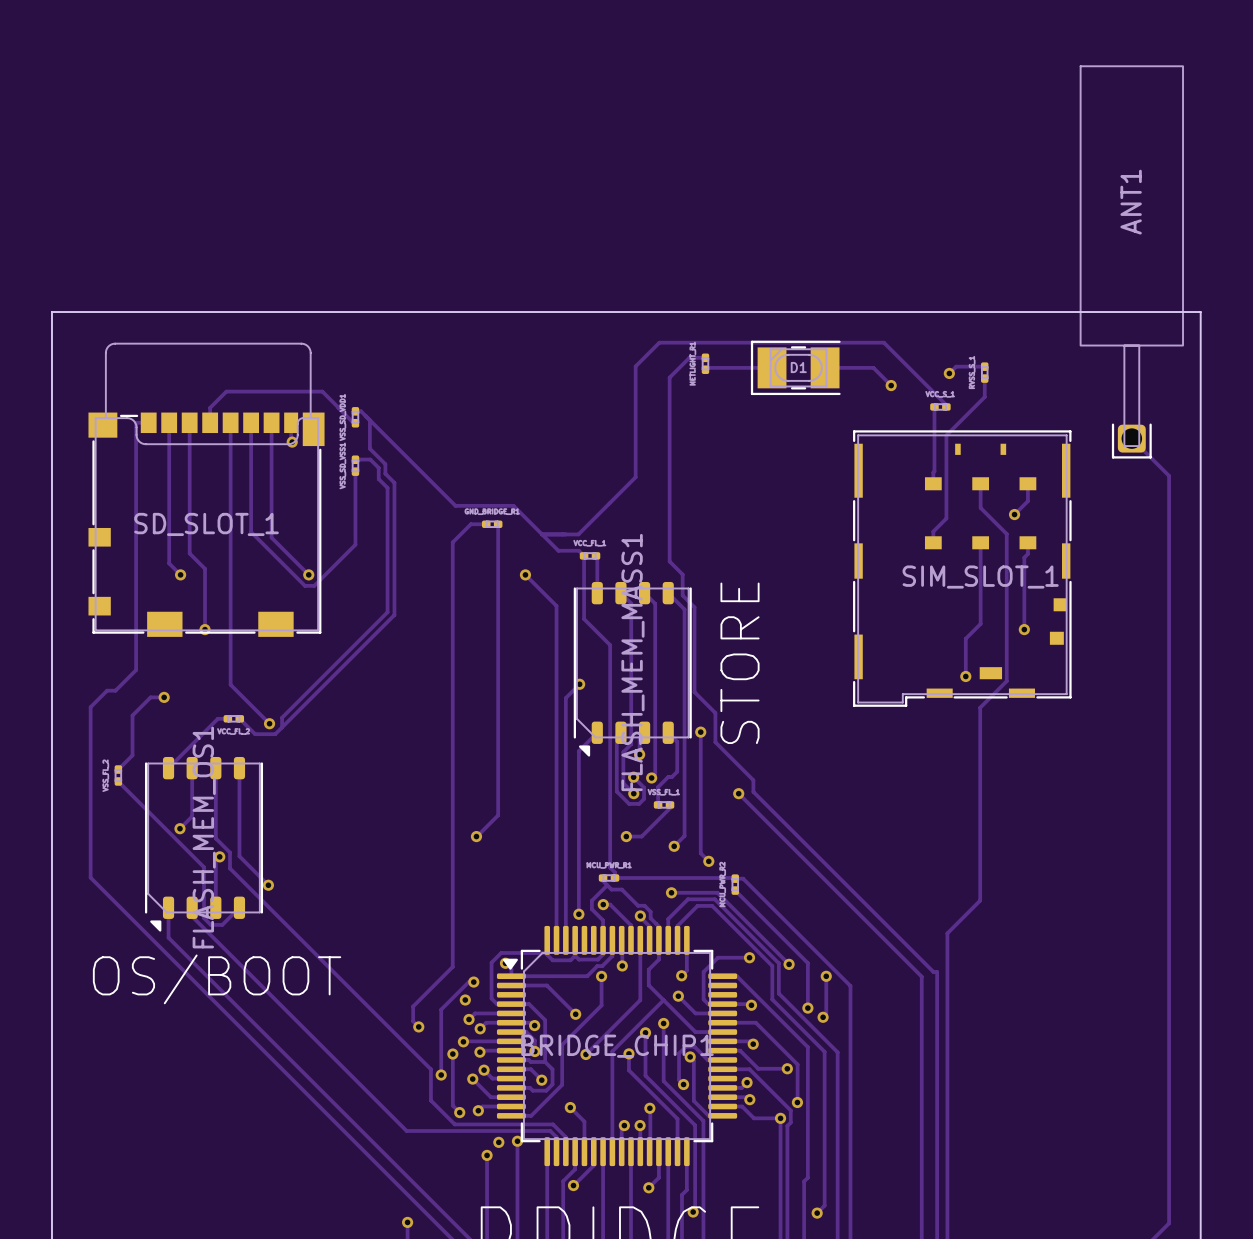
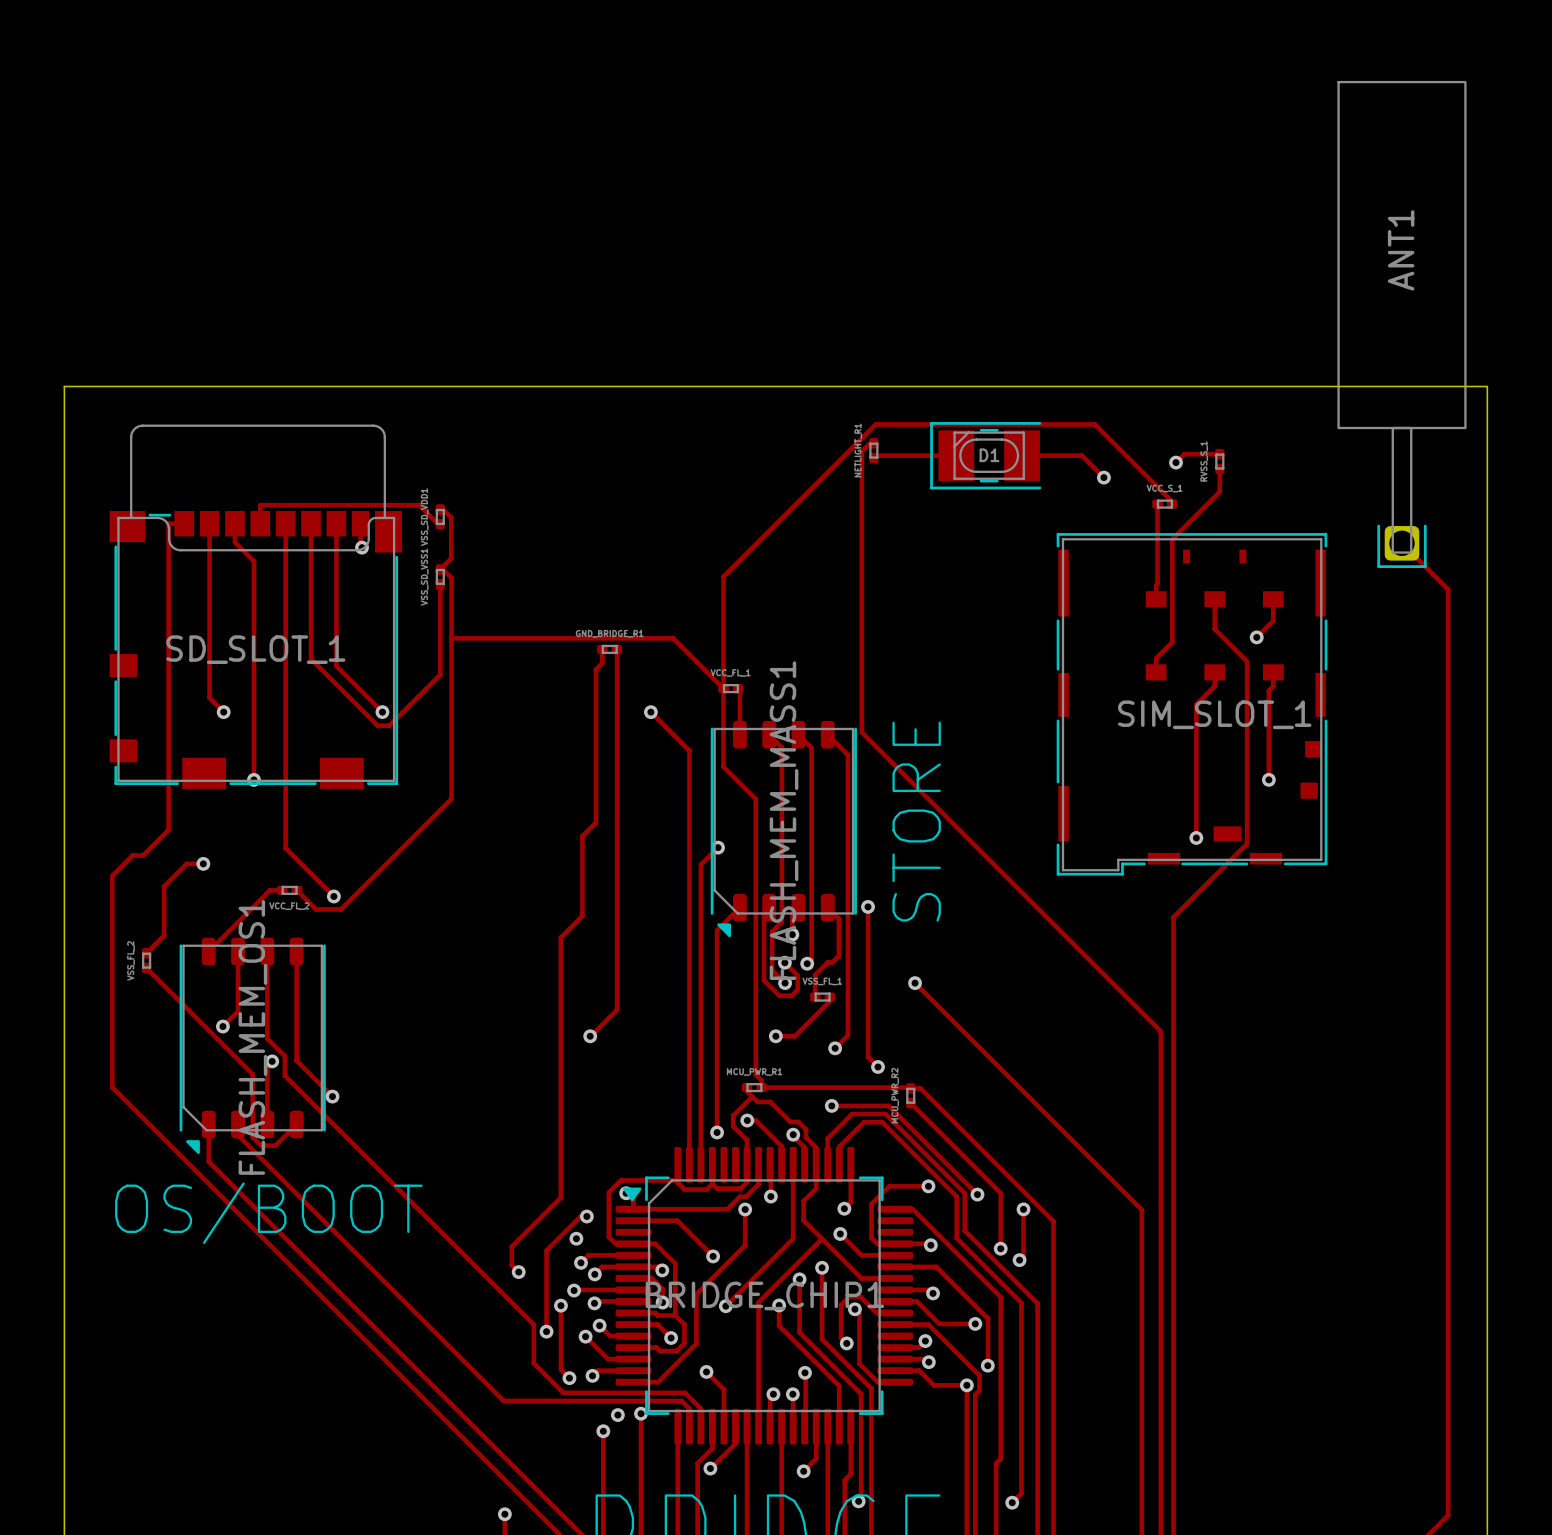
track: (706, 342) (659, 342) (635, 366) (635, 477) (578, 534) (542, 534) -> (875, 424) (723, 576) (723, 688)
track: (702, 357) (689, 357) (669, 377) (669, 561) (682, 574) (682, 595) (694, 607) (694, 692) (715, 713) (715, 742) (753, 780) (753, 791) (933, 972) (937, 972) -> (870, 443) (861, 451) (861, 732) (1160, 1031) (1160, 1204)
track: (338, 407) (322, 391) (226, 391) (210, 407) -> (419, 505) (260, 505)
track: (357, 411) (361, 411) (455, 505) (513, 505) (558, 550) (578, 550) -> (451, 638) (673, 638) (717, 682)
track: none -> (443, 509) (451, 517) (451, 558) (440, 569)
track: (369, 420) (369, 448) (385, 464) (385, 473) (394, 482) (394, 615) (364, 644) -> (443, 569) (451, 577) (451, 798)
track: (189, 437) (189, 553) (205, 568) -> (234, 542) (253, 561) (253, 704)
track: (357, 459) (370, 459) (378, 467) (378, 479) (387, 487) (387, 612) (282, 717) (282, 727) -> none
track: (486, 524) (470, 524) (452, 542) (452, 756) -> (602, 649) (602, 663) (595, 669) (595, 822) (582, 836) (582, 916) (560, 937)
track: (980, 553) (980, 623) (965, 638) -> (1214, 686) (1196, 704) (1196, 791)
track: (980, 707) (980, 900) (947, 933) -> (1214, 876) (1173, 917) (1173, 1156)

